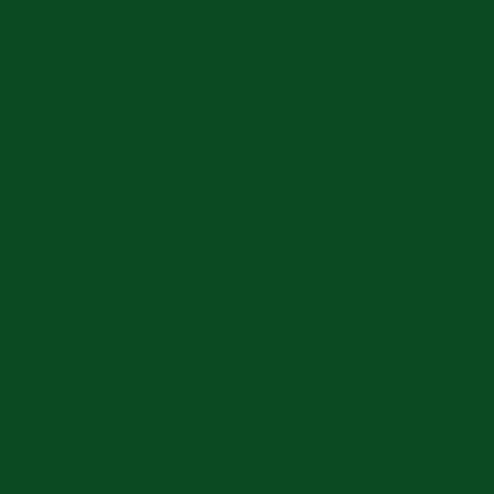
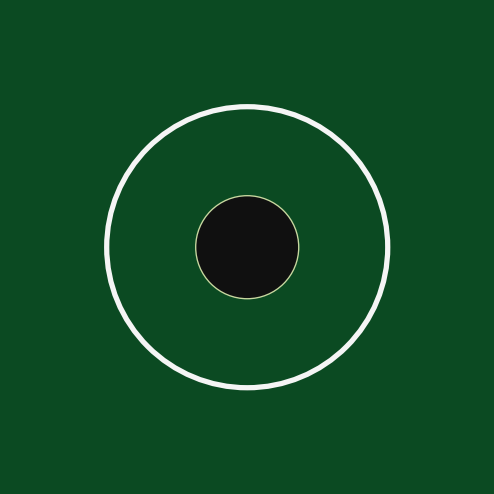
part: none -> (247, 247)

